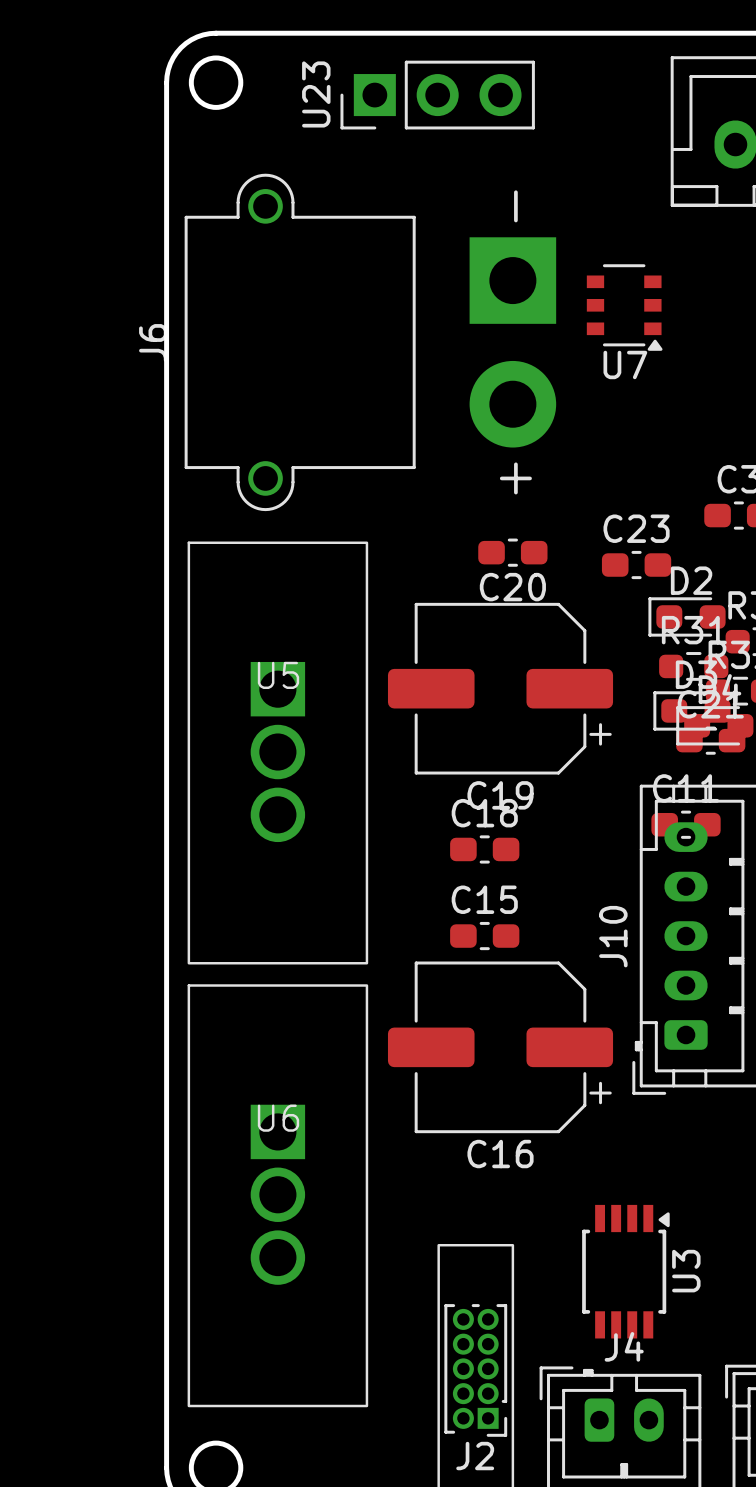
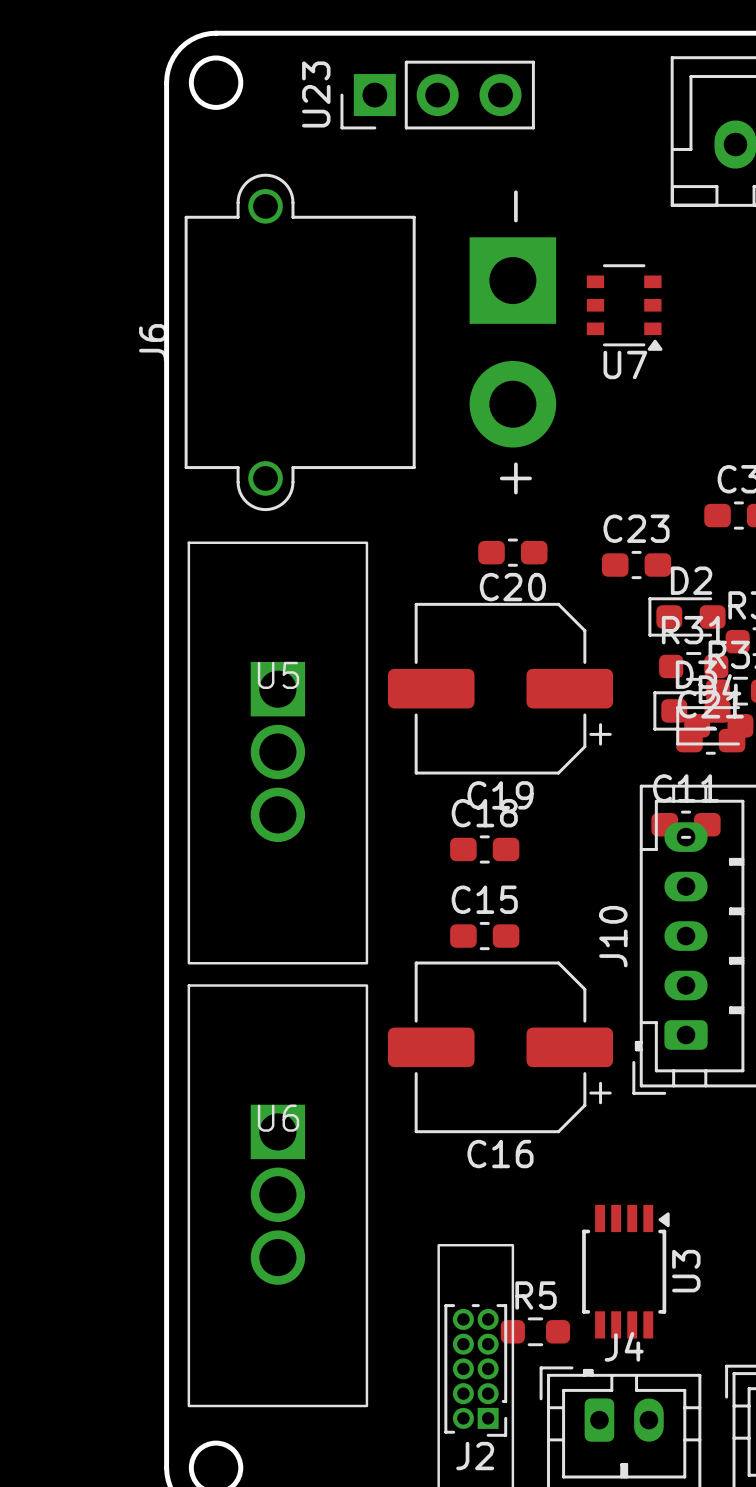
R5: none -> (535, 1331)

